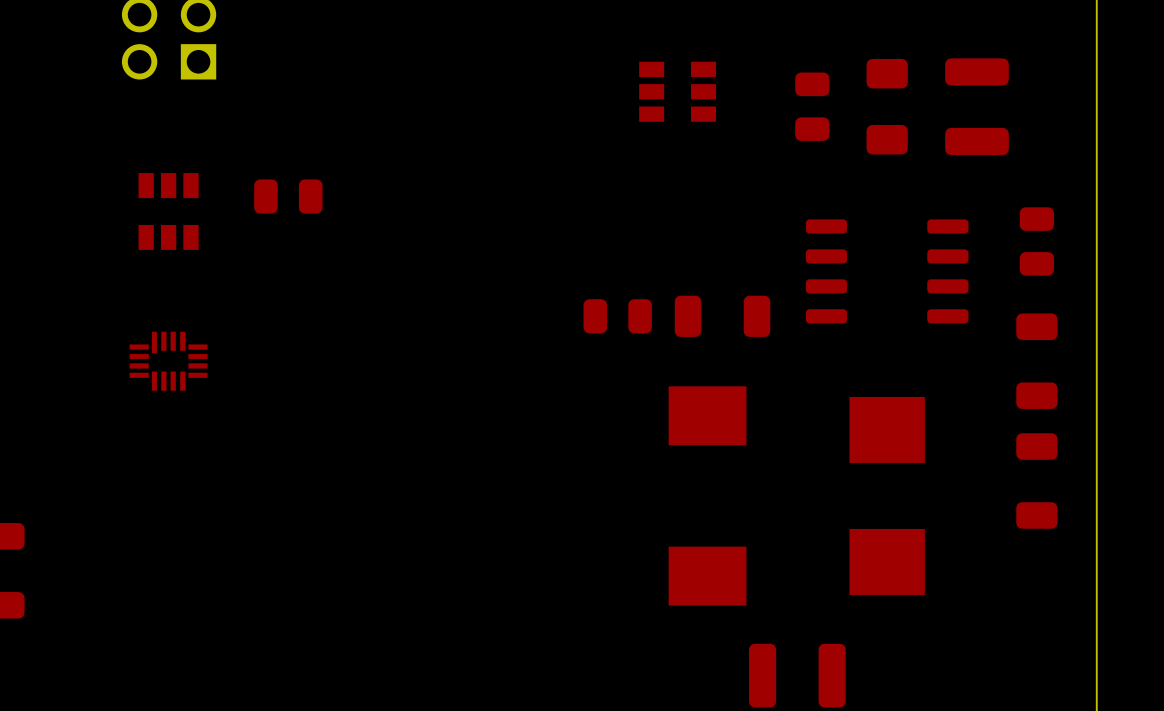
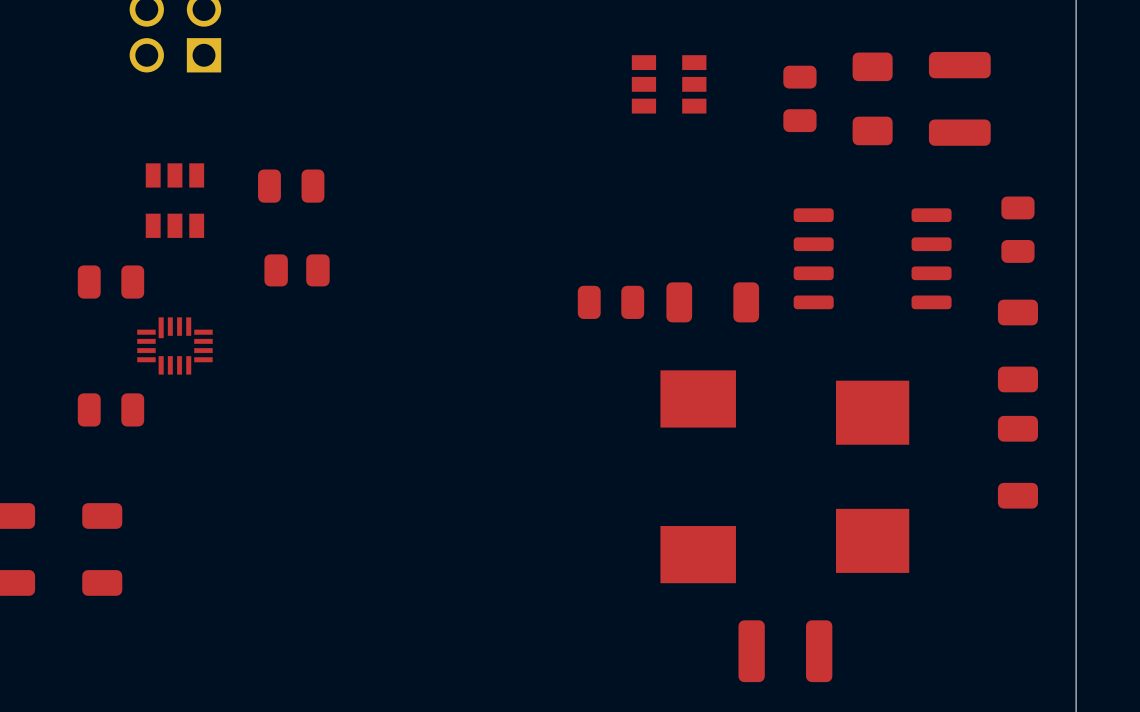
part: none -> (297, 270)
part: none -> (110, 282)
part: none -> (110, 409)
part: none -> (102, 549)

